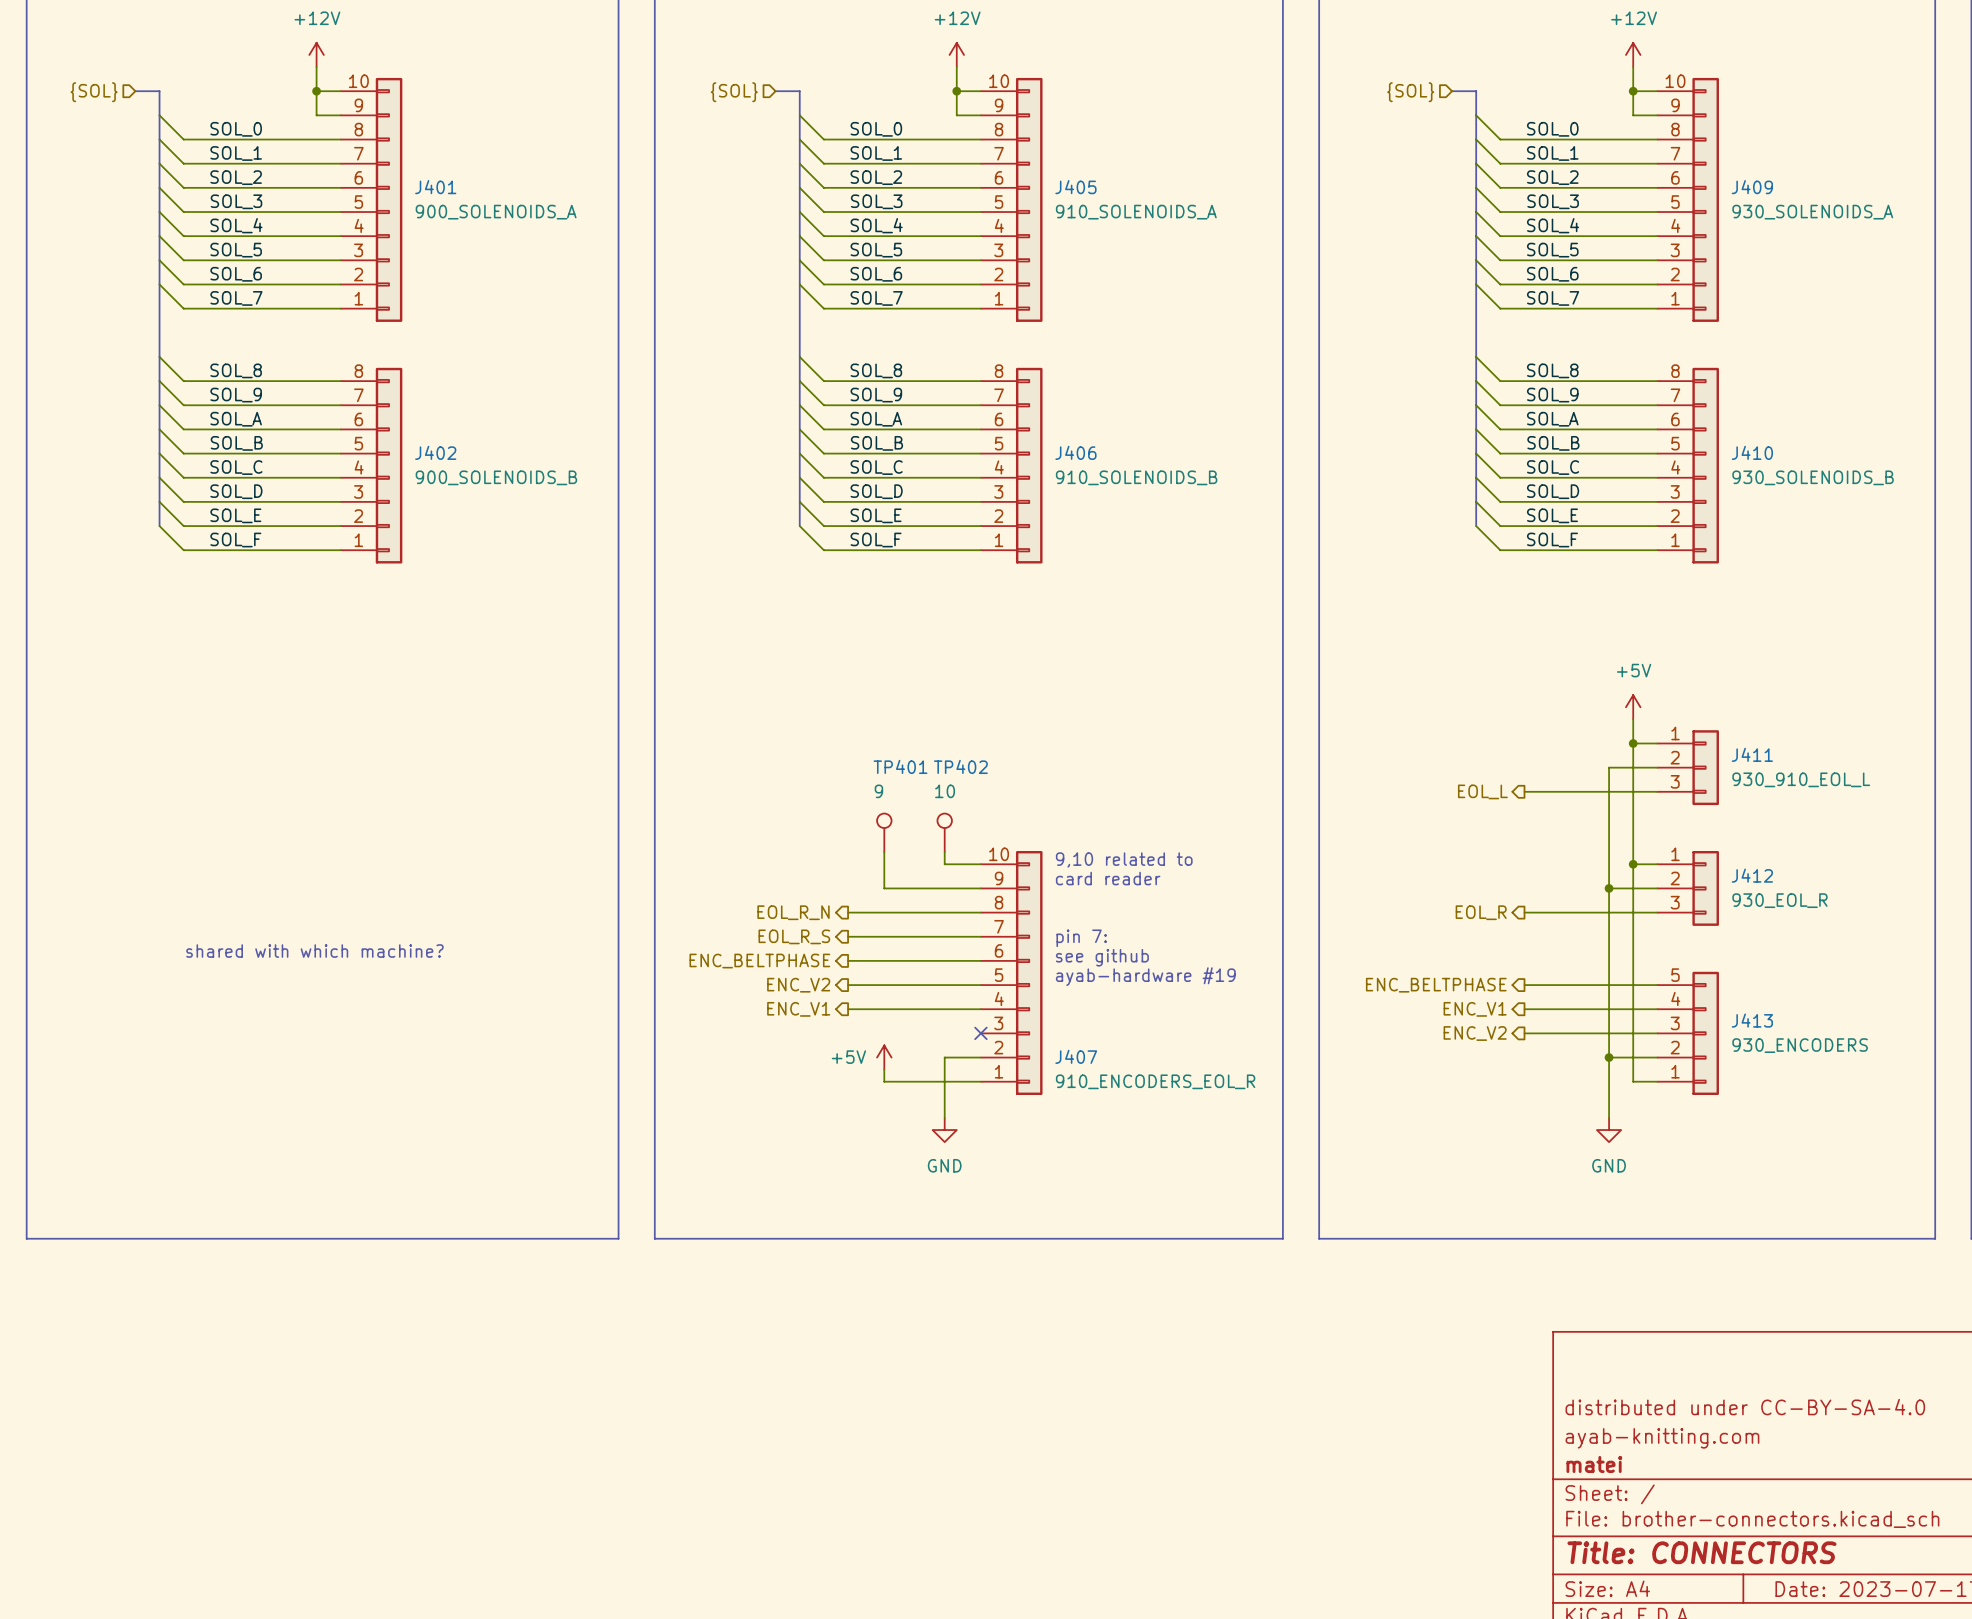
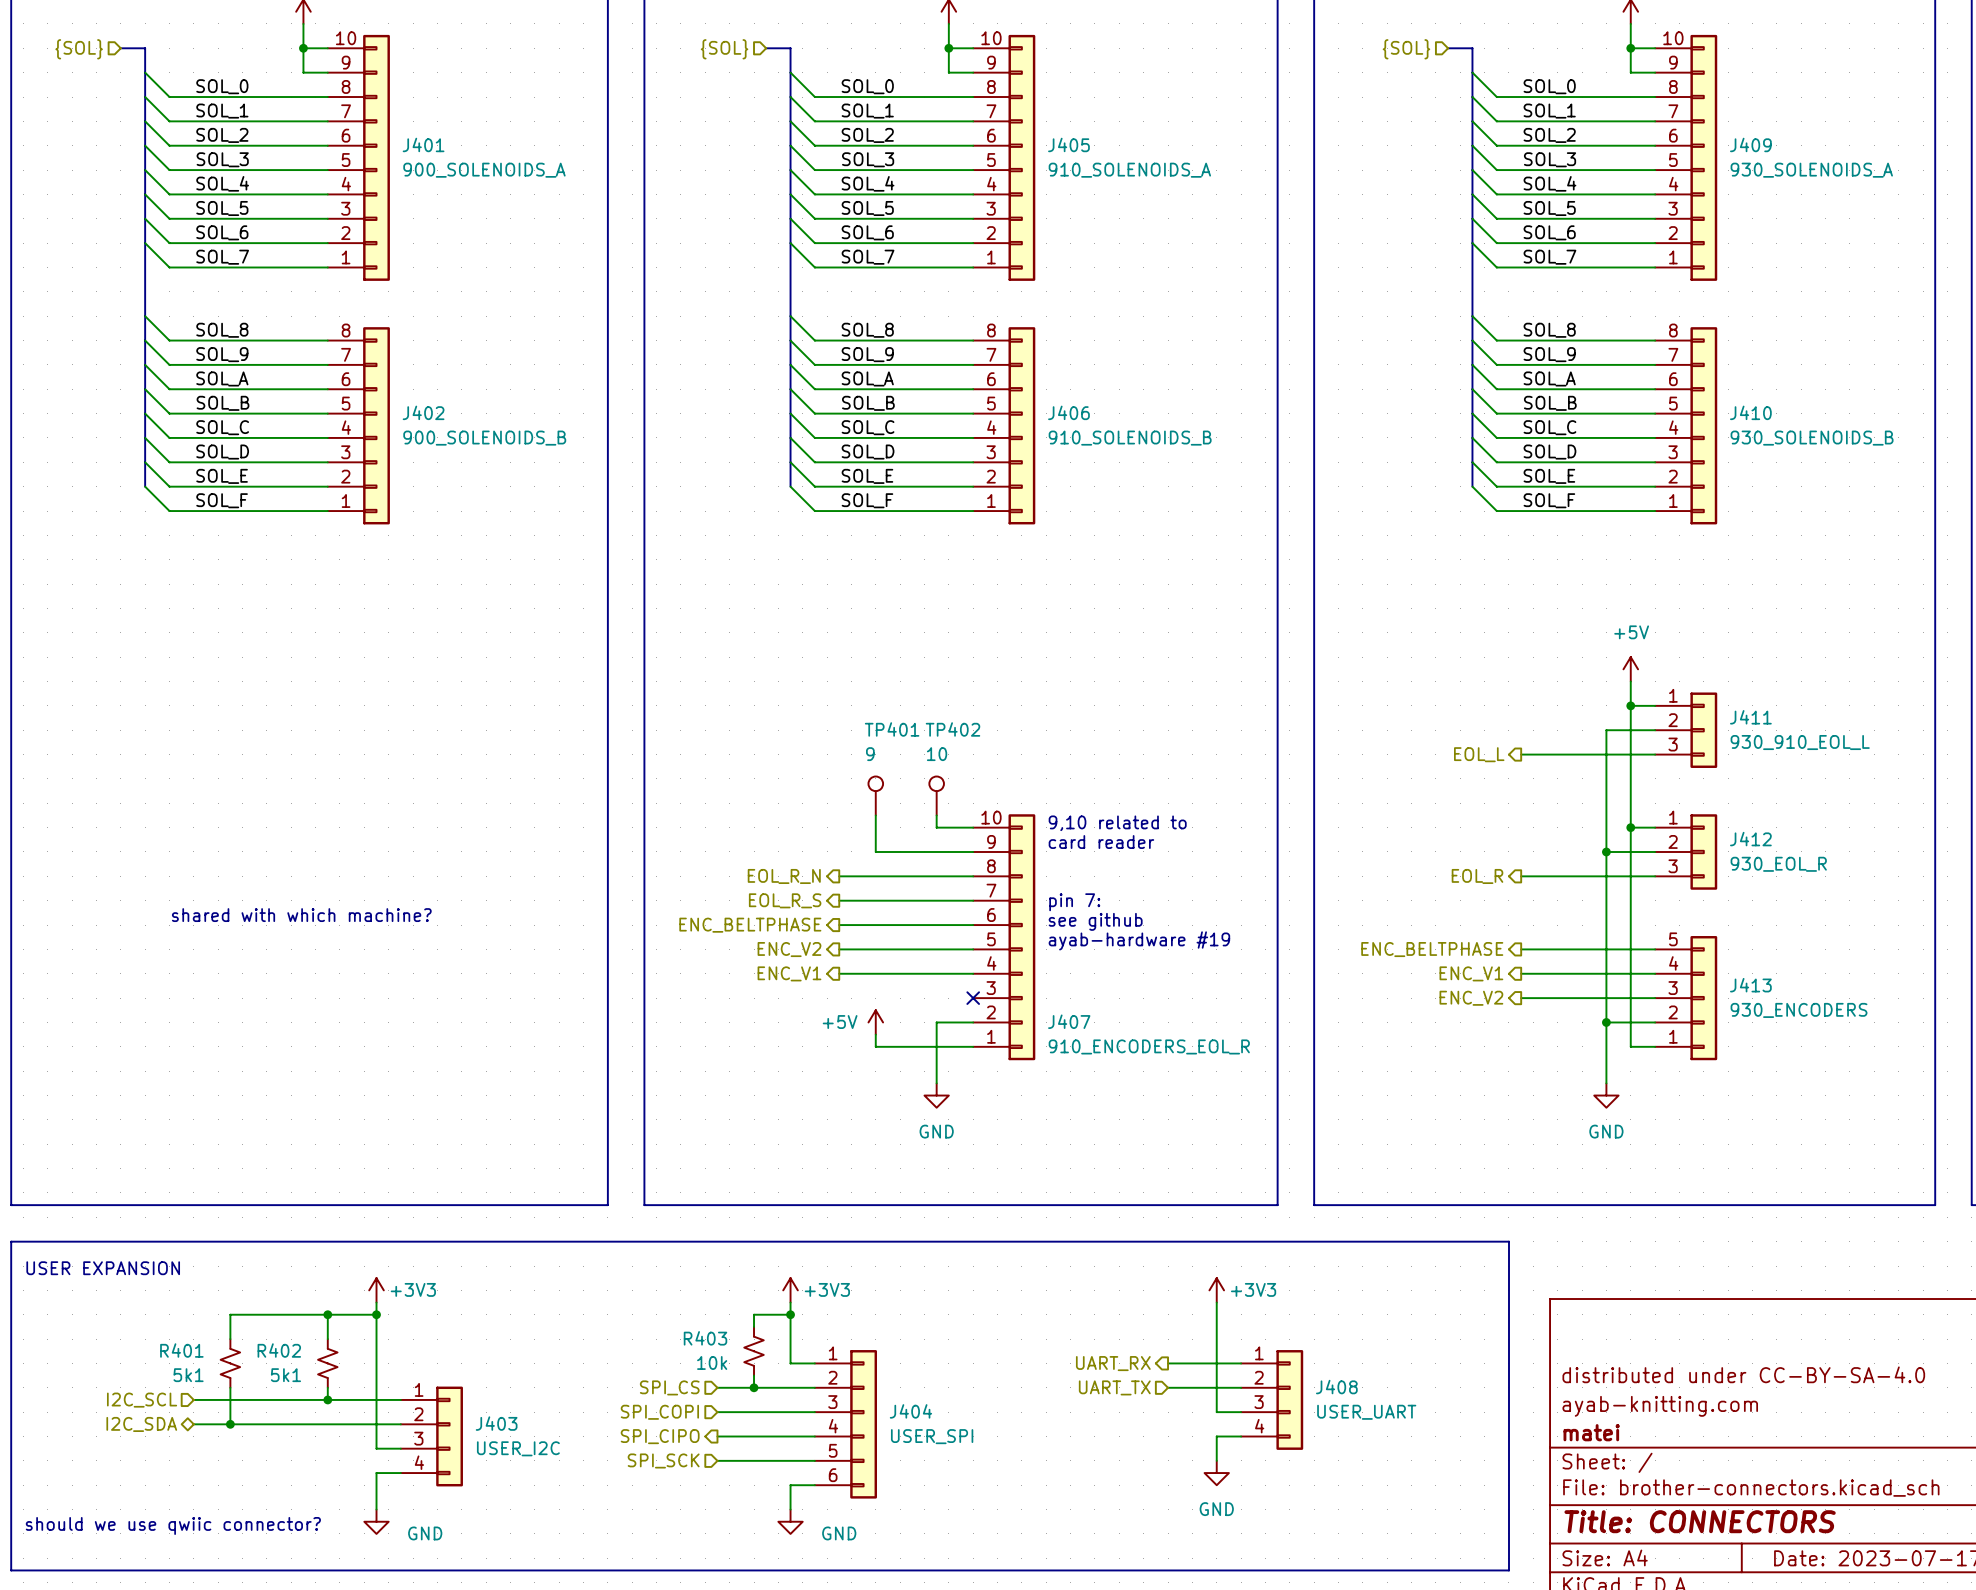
line: none -> (11, 1241) (1508, 1241) (1508, 1570) (11, 1570) (11, 1241)
text: none -> USER EXPANSION (103, 1268)
power symbol: none -> +3V3 (376, 1290)
power symbol: none -> +3V3 (790, 1290)
power symbol: none -> +3V3 (1216, 1290)
wire: none -> (376, 1302) (376, 1448) (400, 1448)
wire: none -> (790, 1302) (790, 1363) (814, 1363)
wire: none -> (1216, 1302) (1216, 1412) (1241, 1412)
wire: none -> (327, 1314) (327, 1339)
junction: none -> (327, 1314)
wire: none -> (376, 1314) (230, 1314) (230, 1339)
junction: none -> (376, 1314)
wire: none -> (790, 1314) (754, 1314) (754, 1326)
junction: none -> (790, 1314)
R403: none -> 10k (754, 1351)
R401: none -> 5k1 (230, 1363)
R402: none -> 5k1 (327, 1363)
hierarchical label: none -> UART_RX (1113, 1363)
wire: none -> (1168, 1363) (1241, 1363)
wire: none -> (754, 1375) (754, 1387)
wire: none -> (230, 1387) (230, 1424)
wire: none -> (327, 1387) (327, 1399)
wire: none -> (717, 1387) (814, 1387)
junction: none -> (754, 1387)
wire: none -> (1168, 1387) (1241, 1387)
hierarchical label: none -> SPI_CS (669, 1387)
hierarchical label: none -> UART_TX (1114, 1387)
hierarchical label: none -> I2C_SCL (142, 1400)
wire: none -> (193, 1399) (400, 1399)
junction: none -> (327, 1399)
J408: none -> USER_UART (1272, 1399)
hierarchical label: none -> SPI_COPI (659, 1412)
wire: none -> (717, 1412) (814, 1412)
hierarchical label: none -> I2C_SDA (141, 1424)
wire: none -> (193, 1424) (400, 1424)
junction: none -> (230, 1424)
J404: none -> USER_SPI (845, 1424)
J403: none -> USER_I2C (431, 1436)
hierarchical label: none -> SPI_CIPO (660, 1436)
wire: none -> (717, 1436) (814, 1436)
wire: none -> (1241, 1436) (1216, 1436) (1216, 1460)
hierarchical label: none -> SPI_SCK (663, 1460)
wire: none -> (717, 1460) (814, 1460)
wire: none -> (400, 1473) (376, 1473) (376, 1509)
power symbol: none -> GND (1216, 1473)
wire: none -> (814, 1485) (790, 1485) (790, 1509)
power symbol: none -> GND (376, 1521)
power symbol: none -> GND (790, 1521)
text: none -> should we use qwiic connector? (173, 1525)

